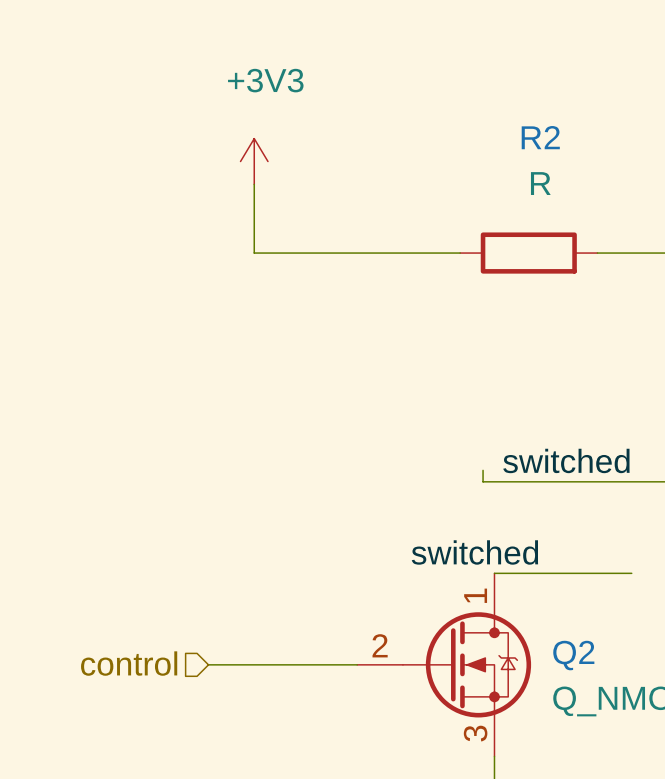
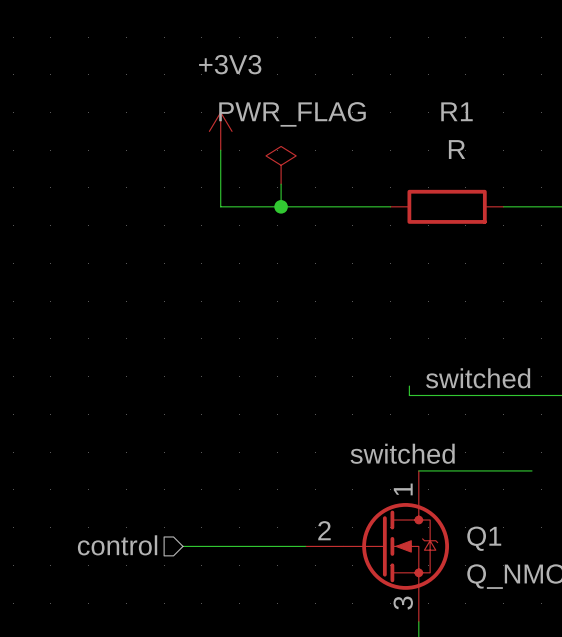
R2 name: R2 (540, 137) -> R1 (456, 111)
power symbol: none -> PWR_FLAG (281, 165)
wire: none -> (281, 184) (281, 206)
junction: none -> (281, 206)
Q2 name: Q2 (573, 655) -> Q1 (484, 538)

